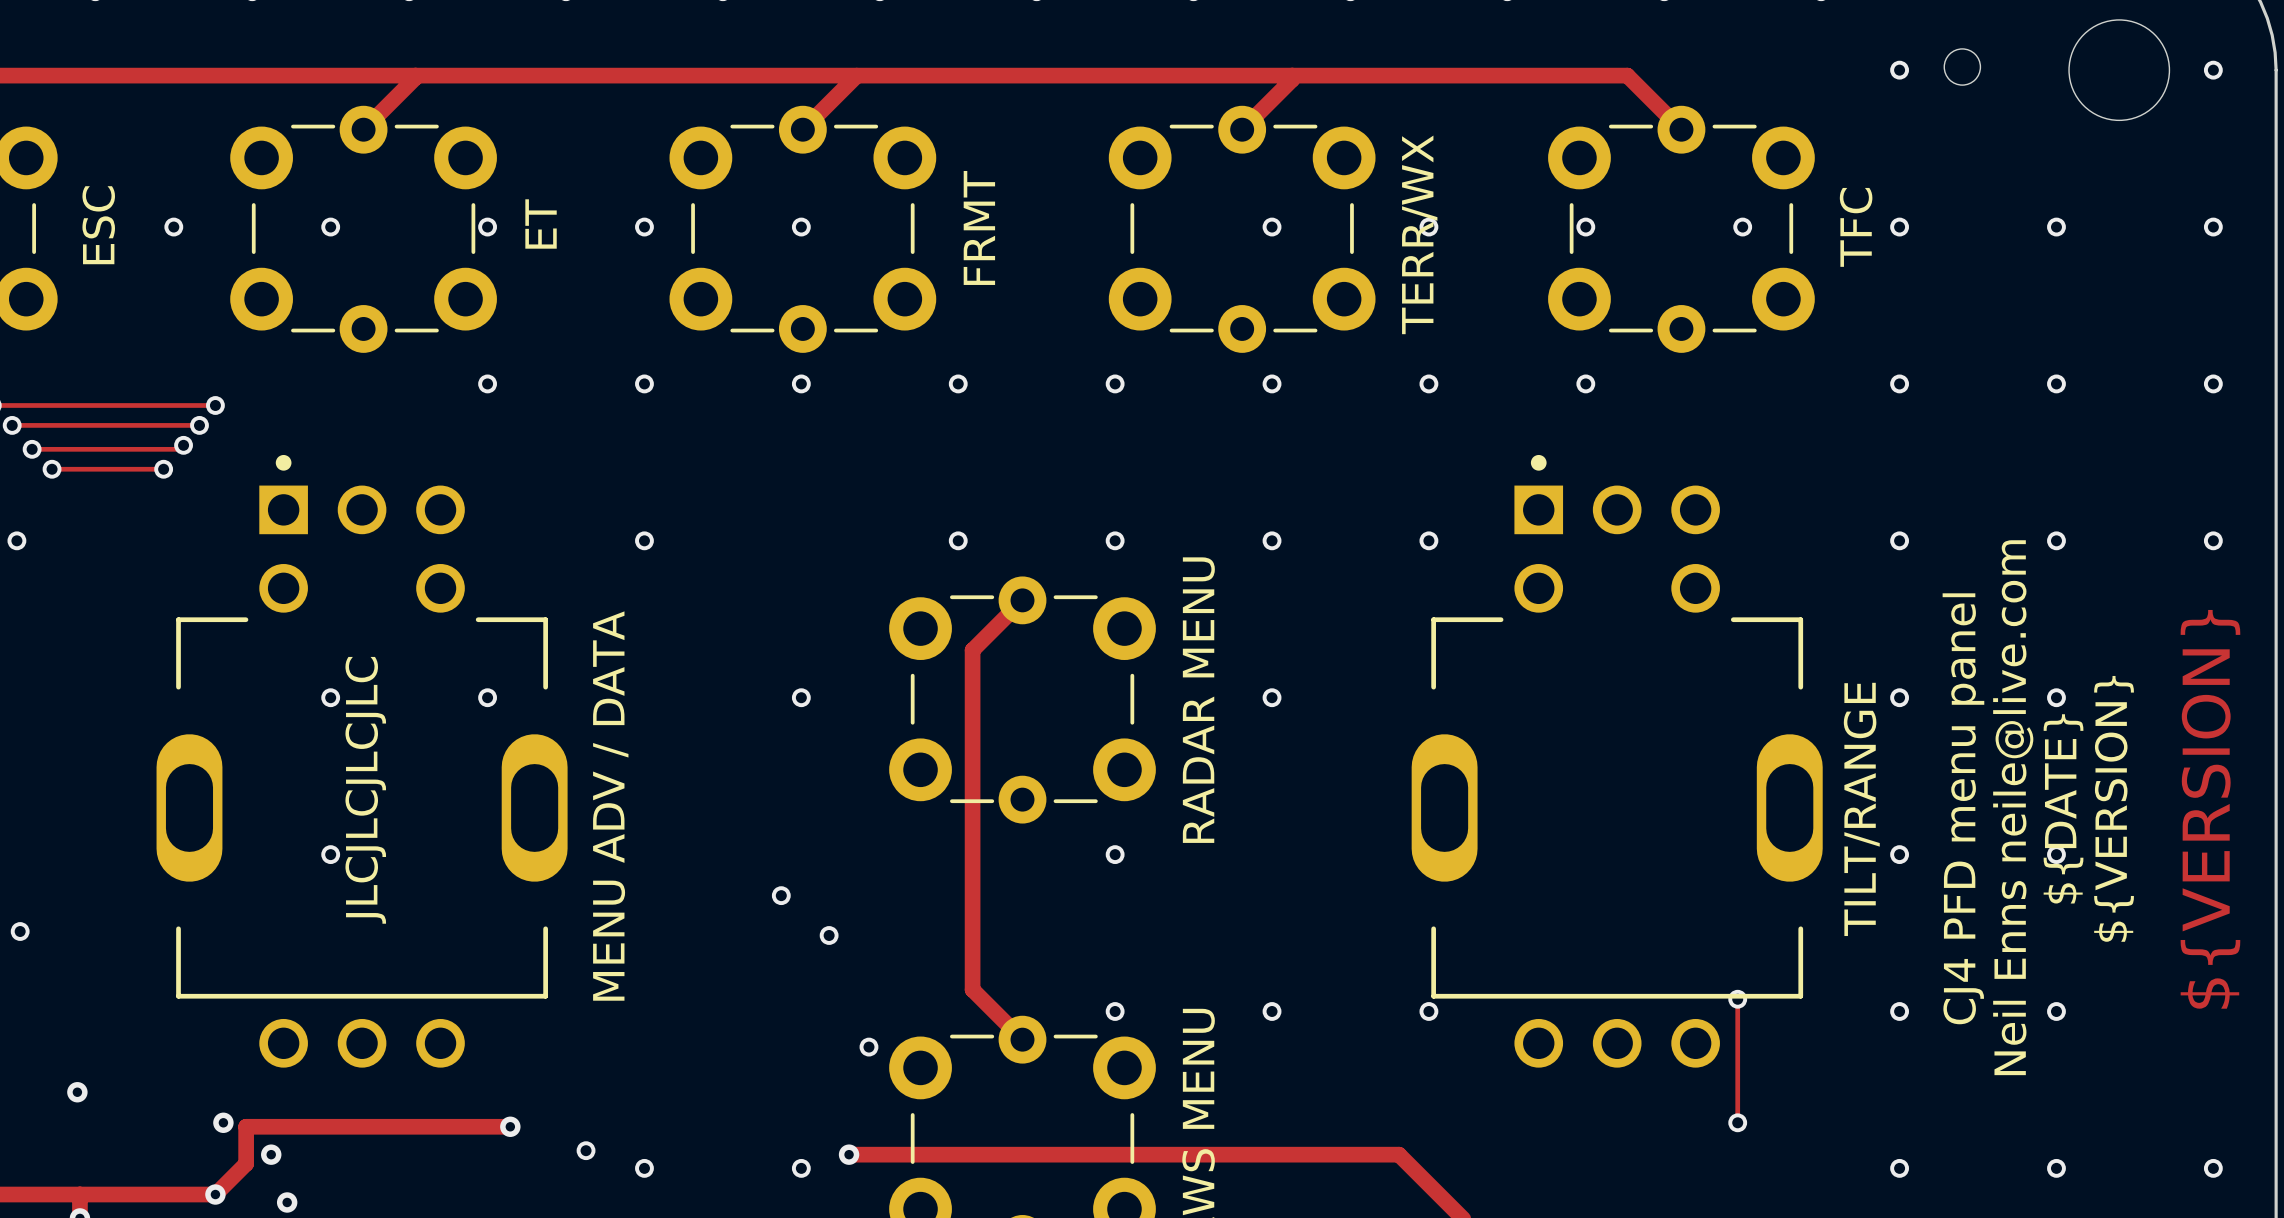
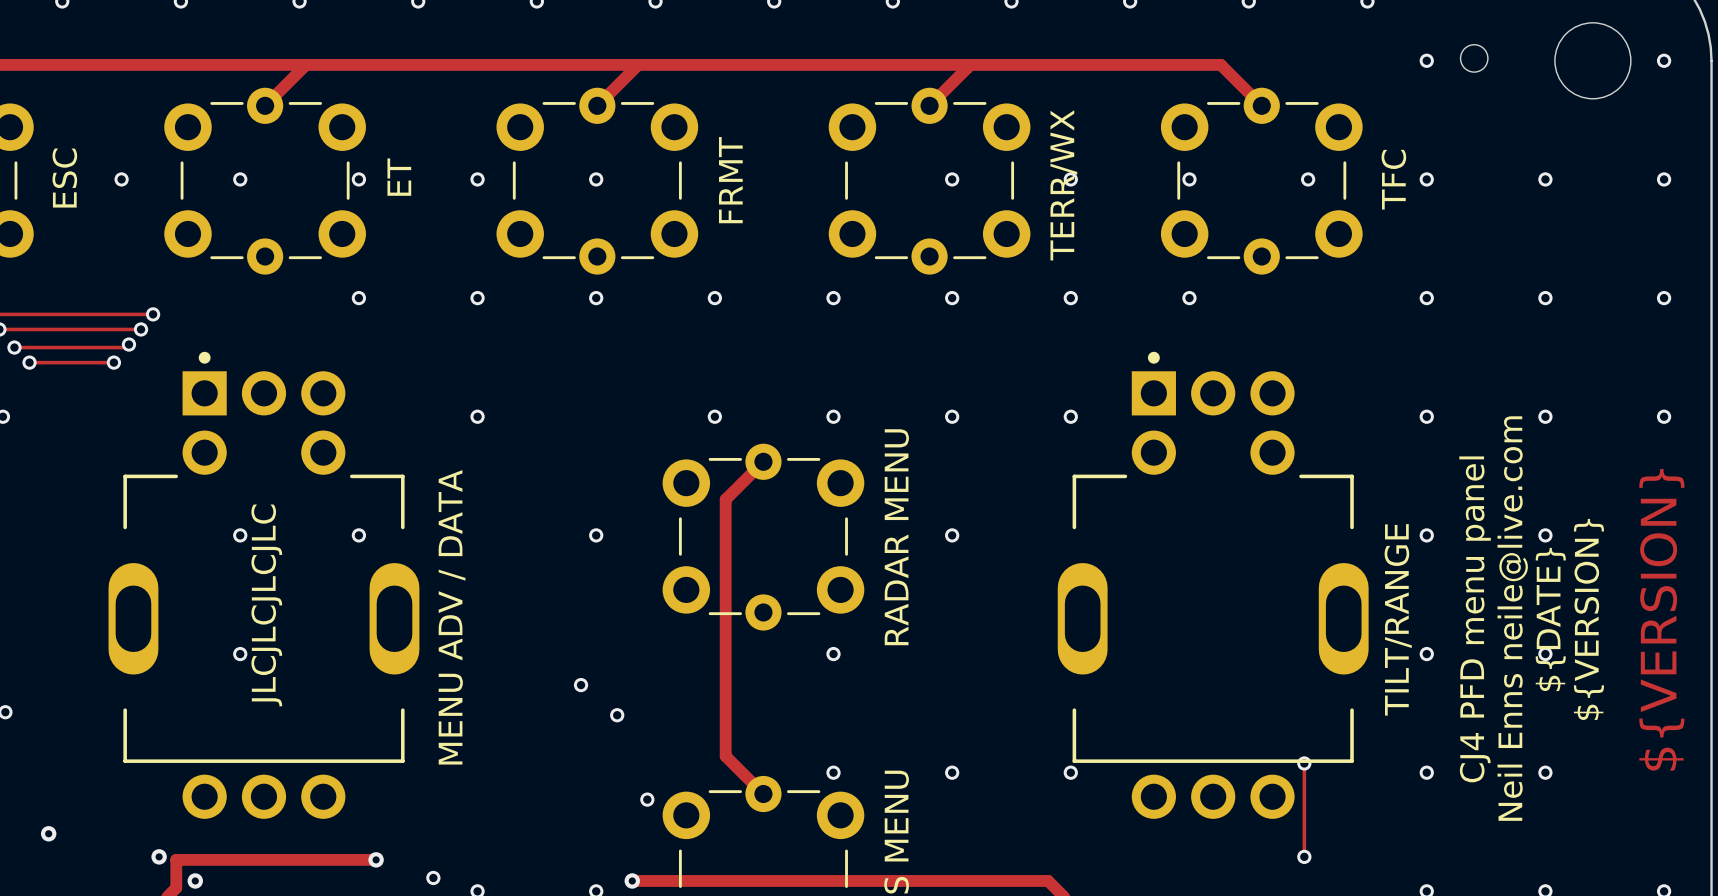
part footprint: [156, 454, 568, 1068] -> [108, 351, 420, 819]
part footprint: [1411, 454, 1823, 1068] -> [1057, 351, 1369, 819]

